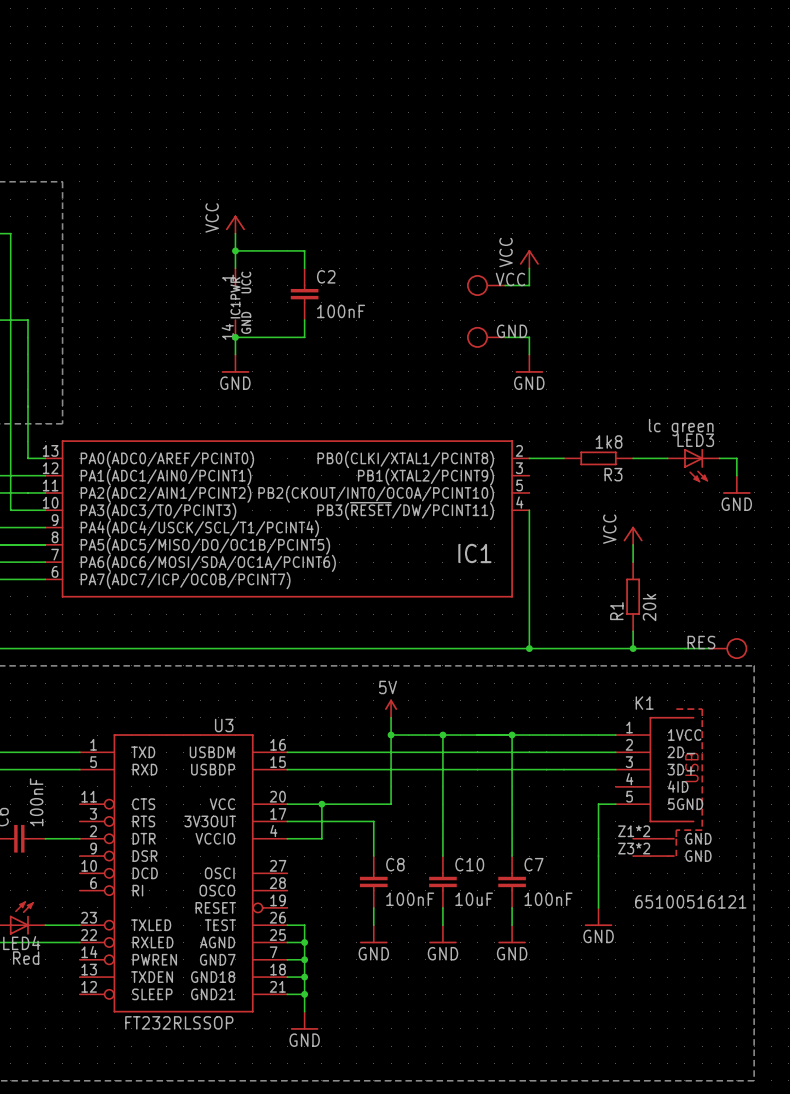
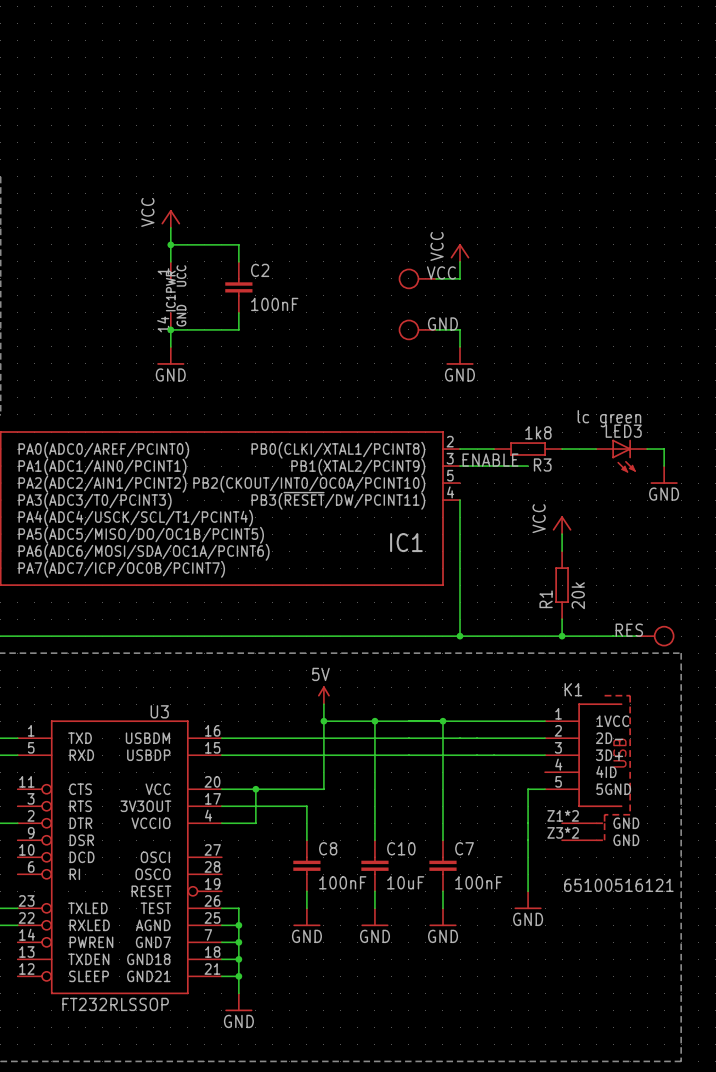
label: none -> ENABLE (490, 460)
wire: none -> (460, 466) (528, 466)

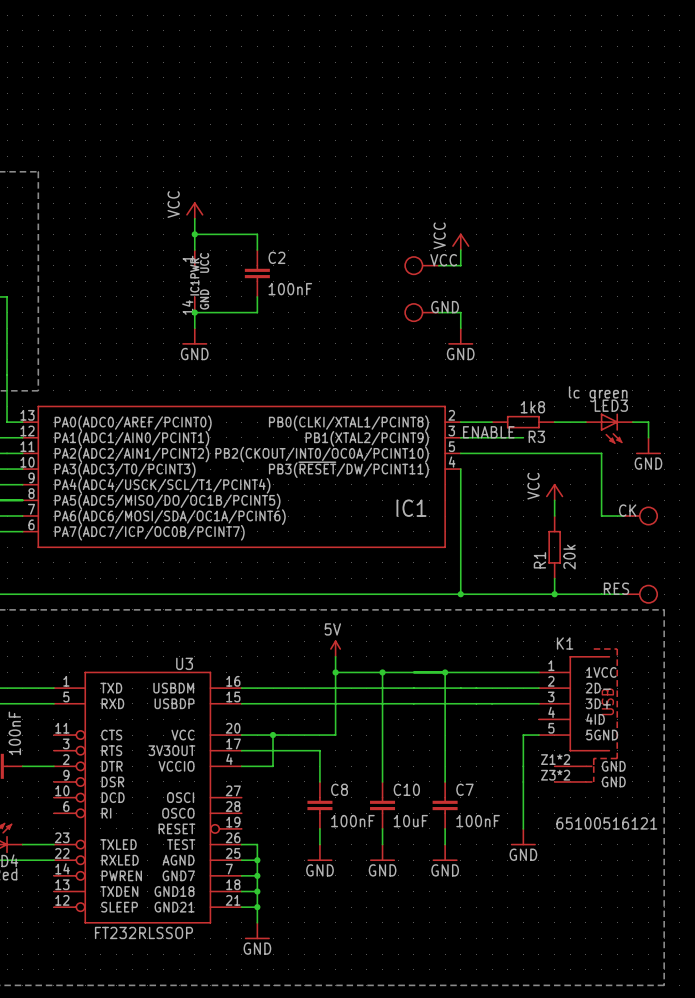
wire: none -> (460, 453) (601, 453) (601, 516) (623, 516)
label: none -> CK (627, 510)
part: none -> (640, 516)

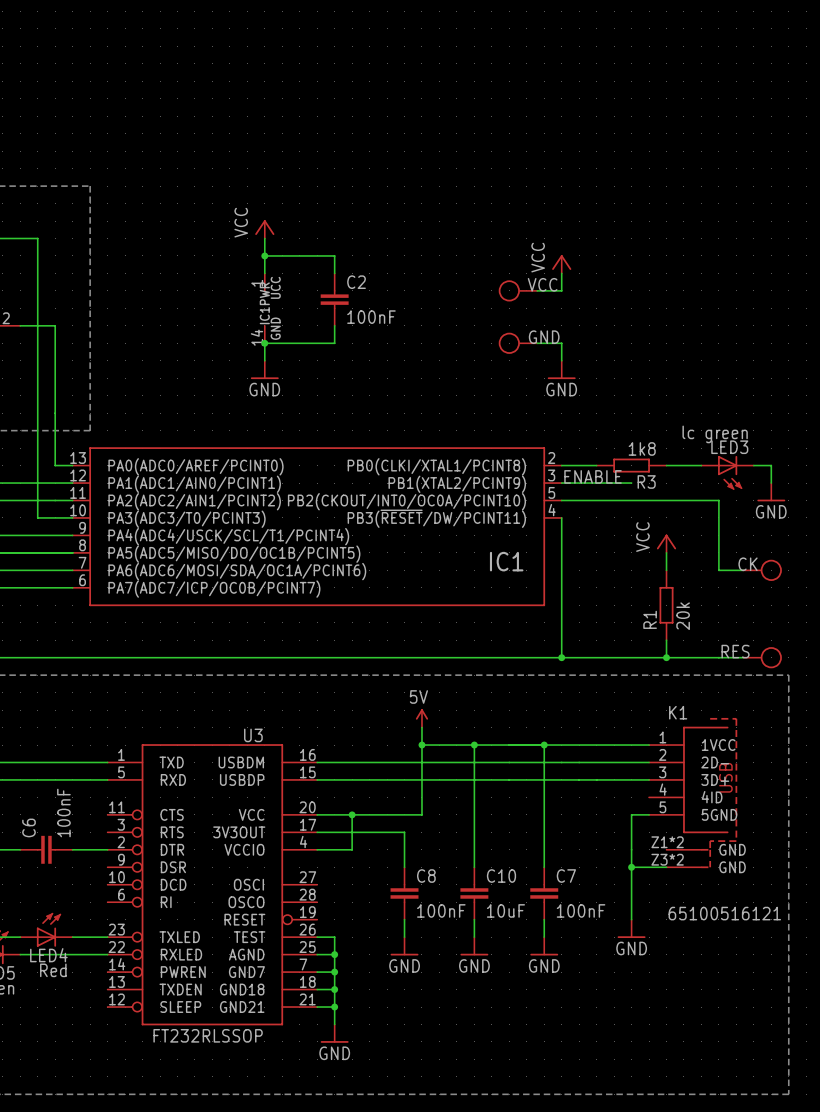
wire: none -> (631, 867) (666, 867)
junction: none -> (631, 867)

